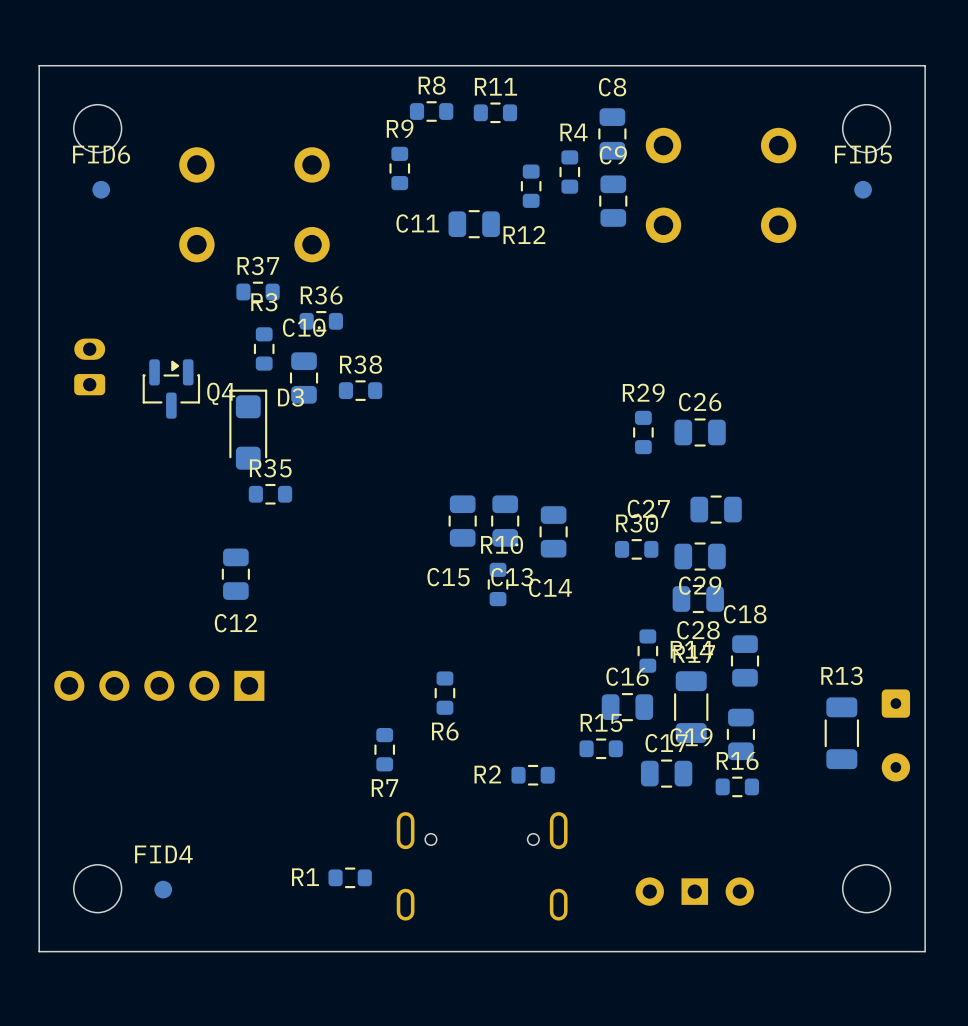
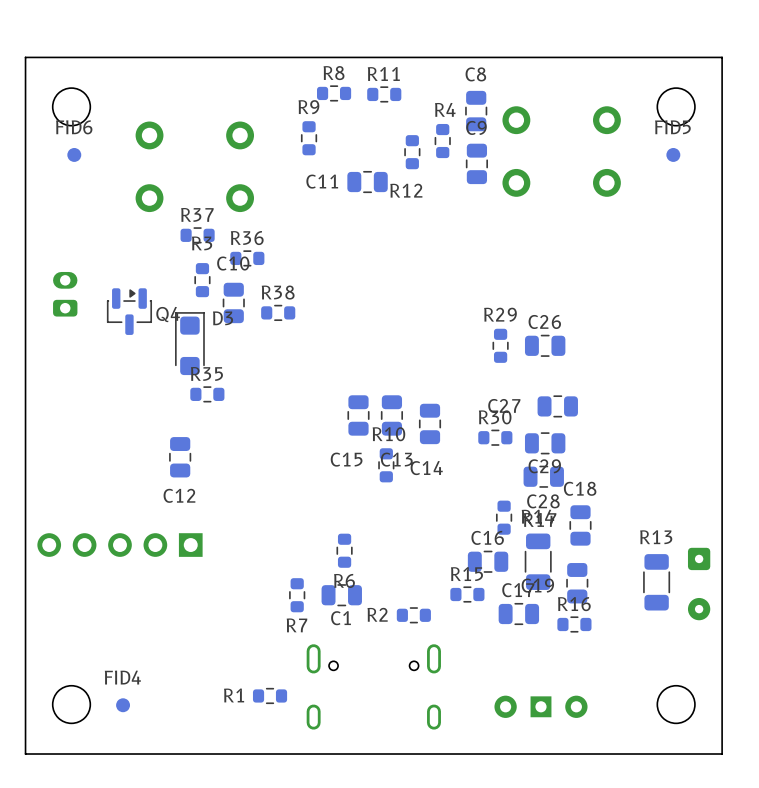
C1: none -> (341, 595)

